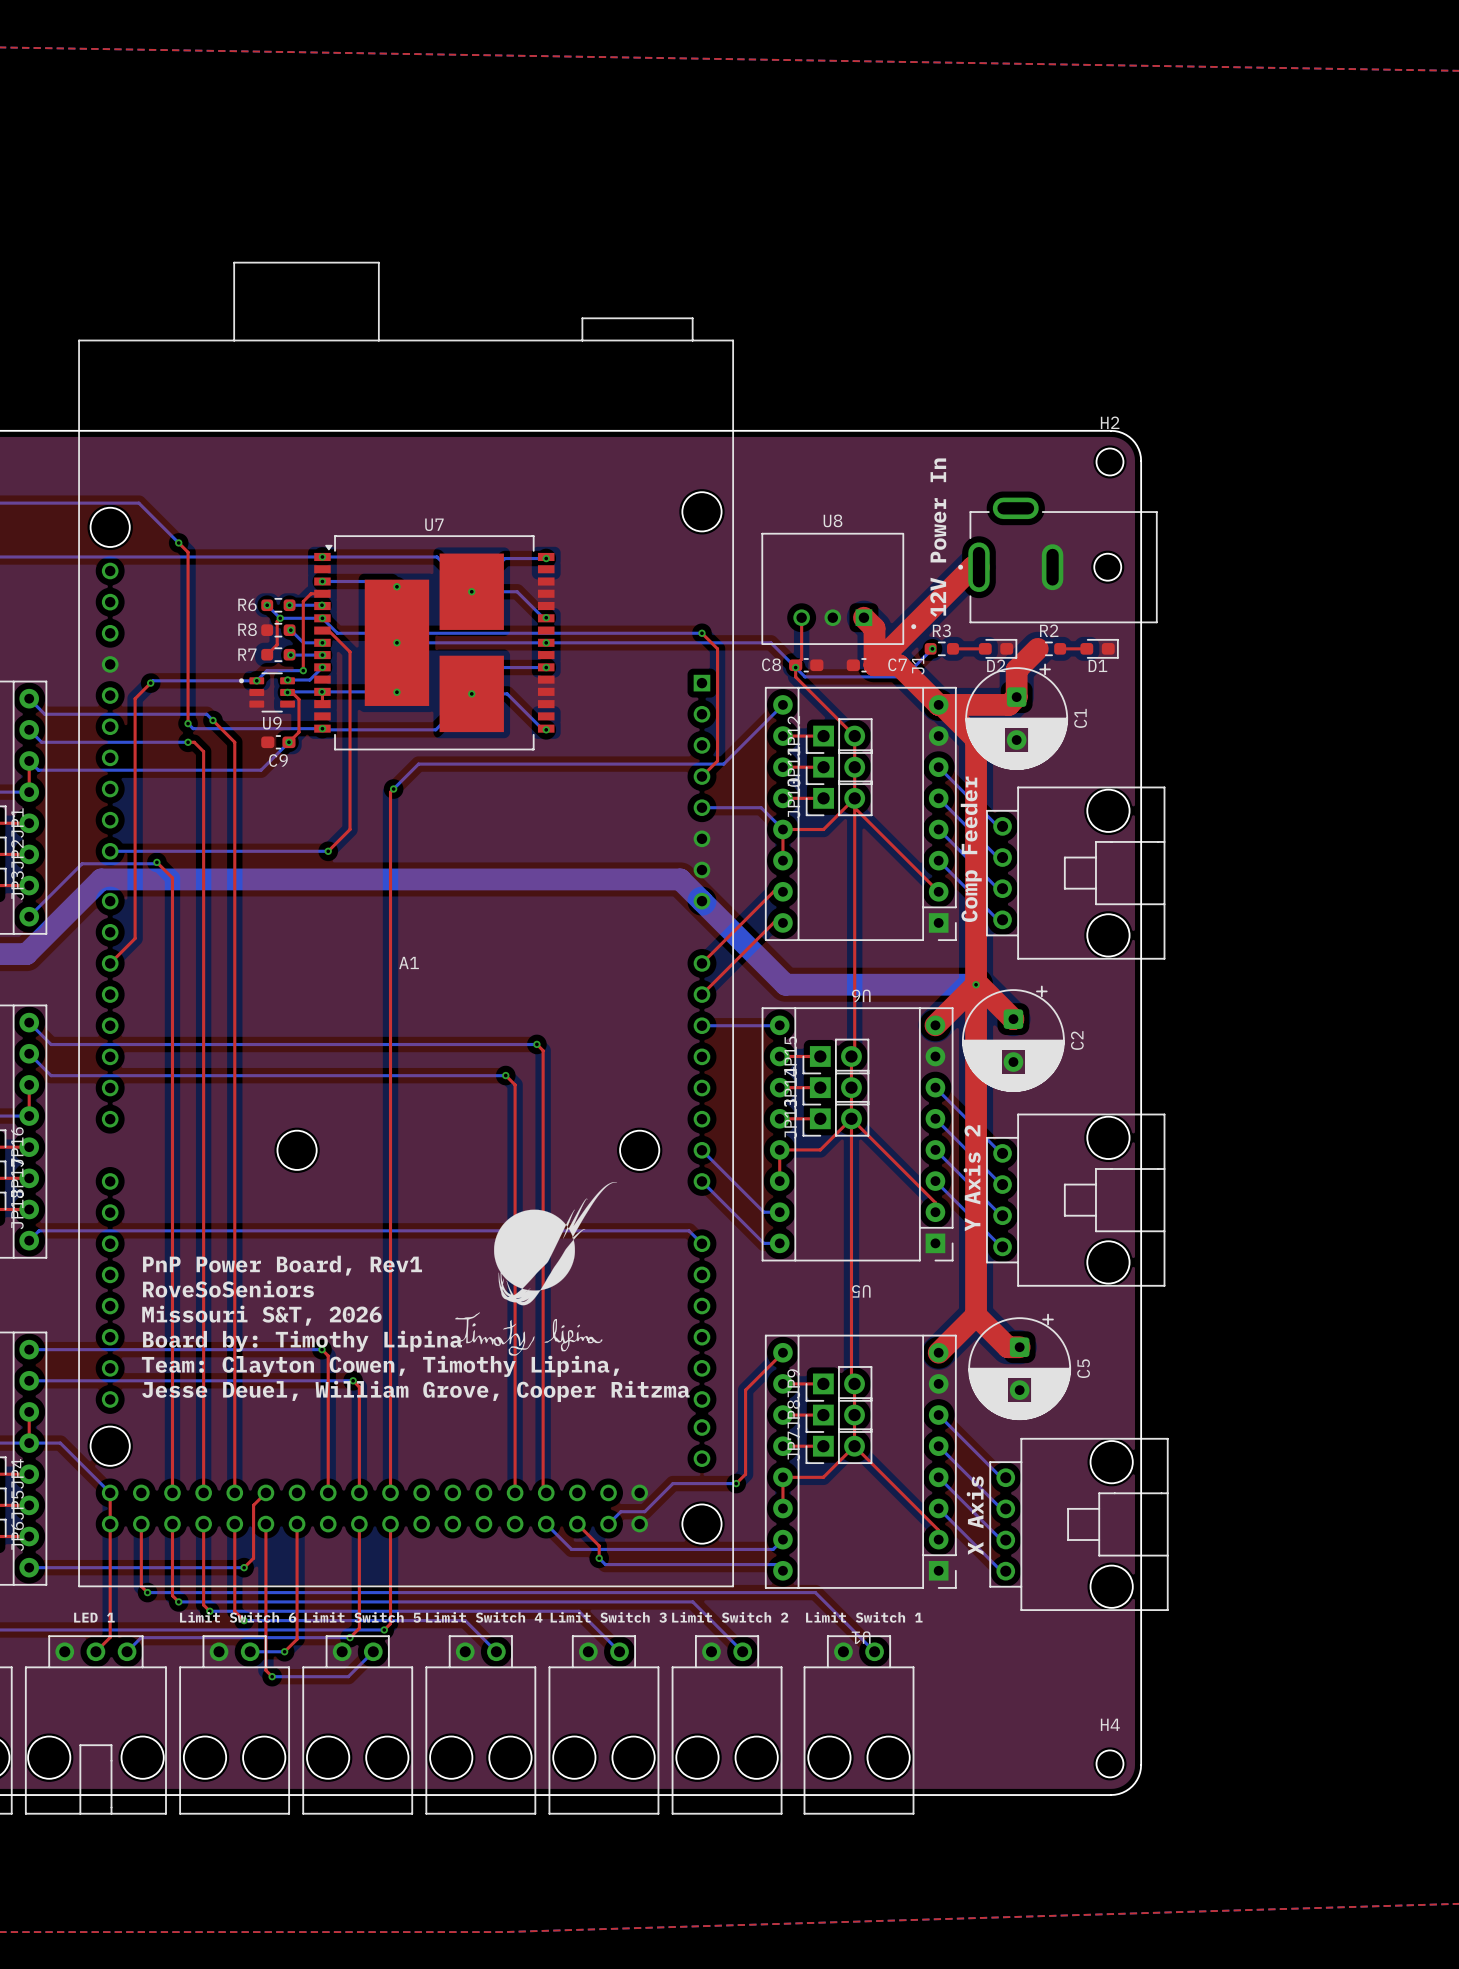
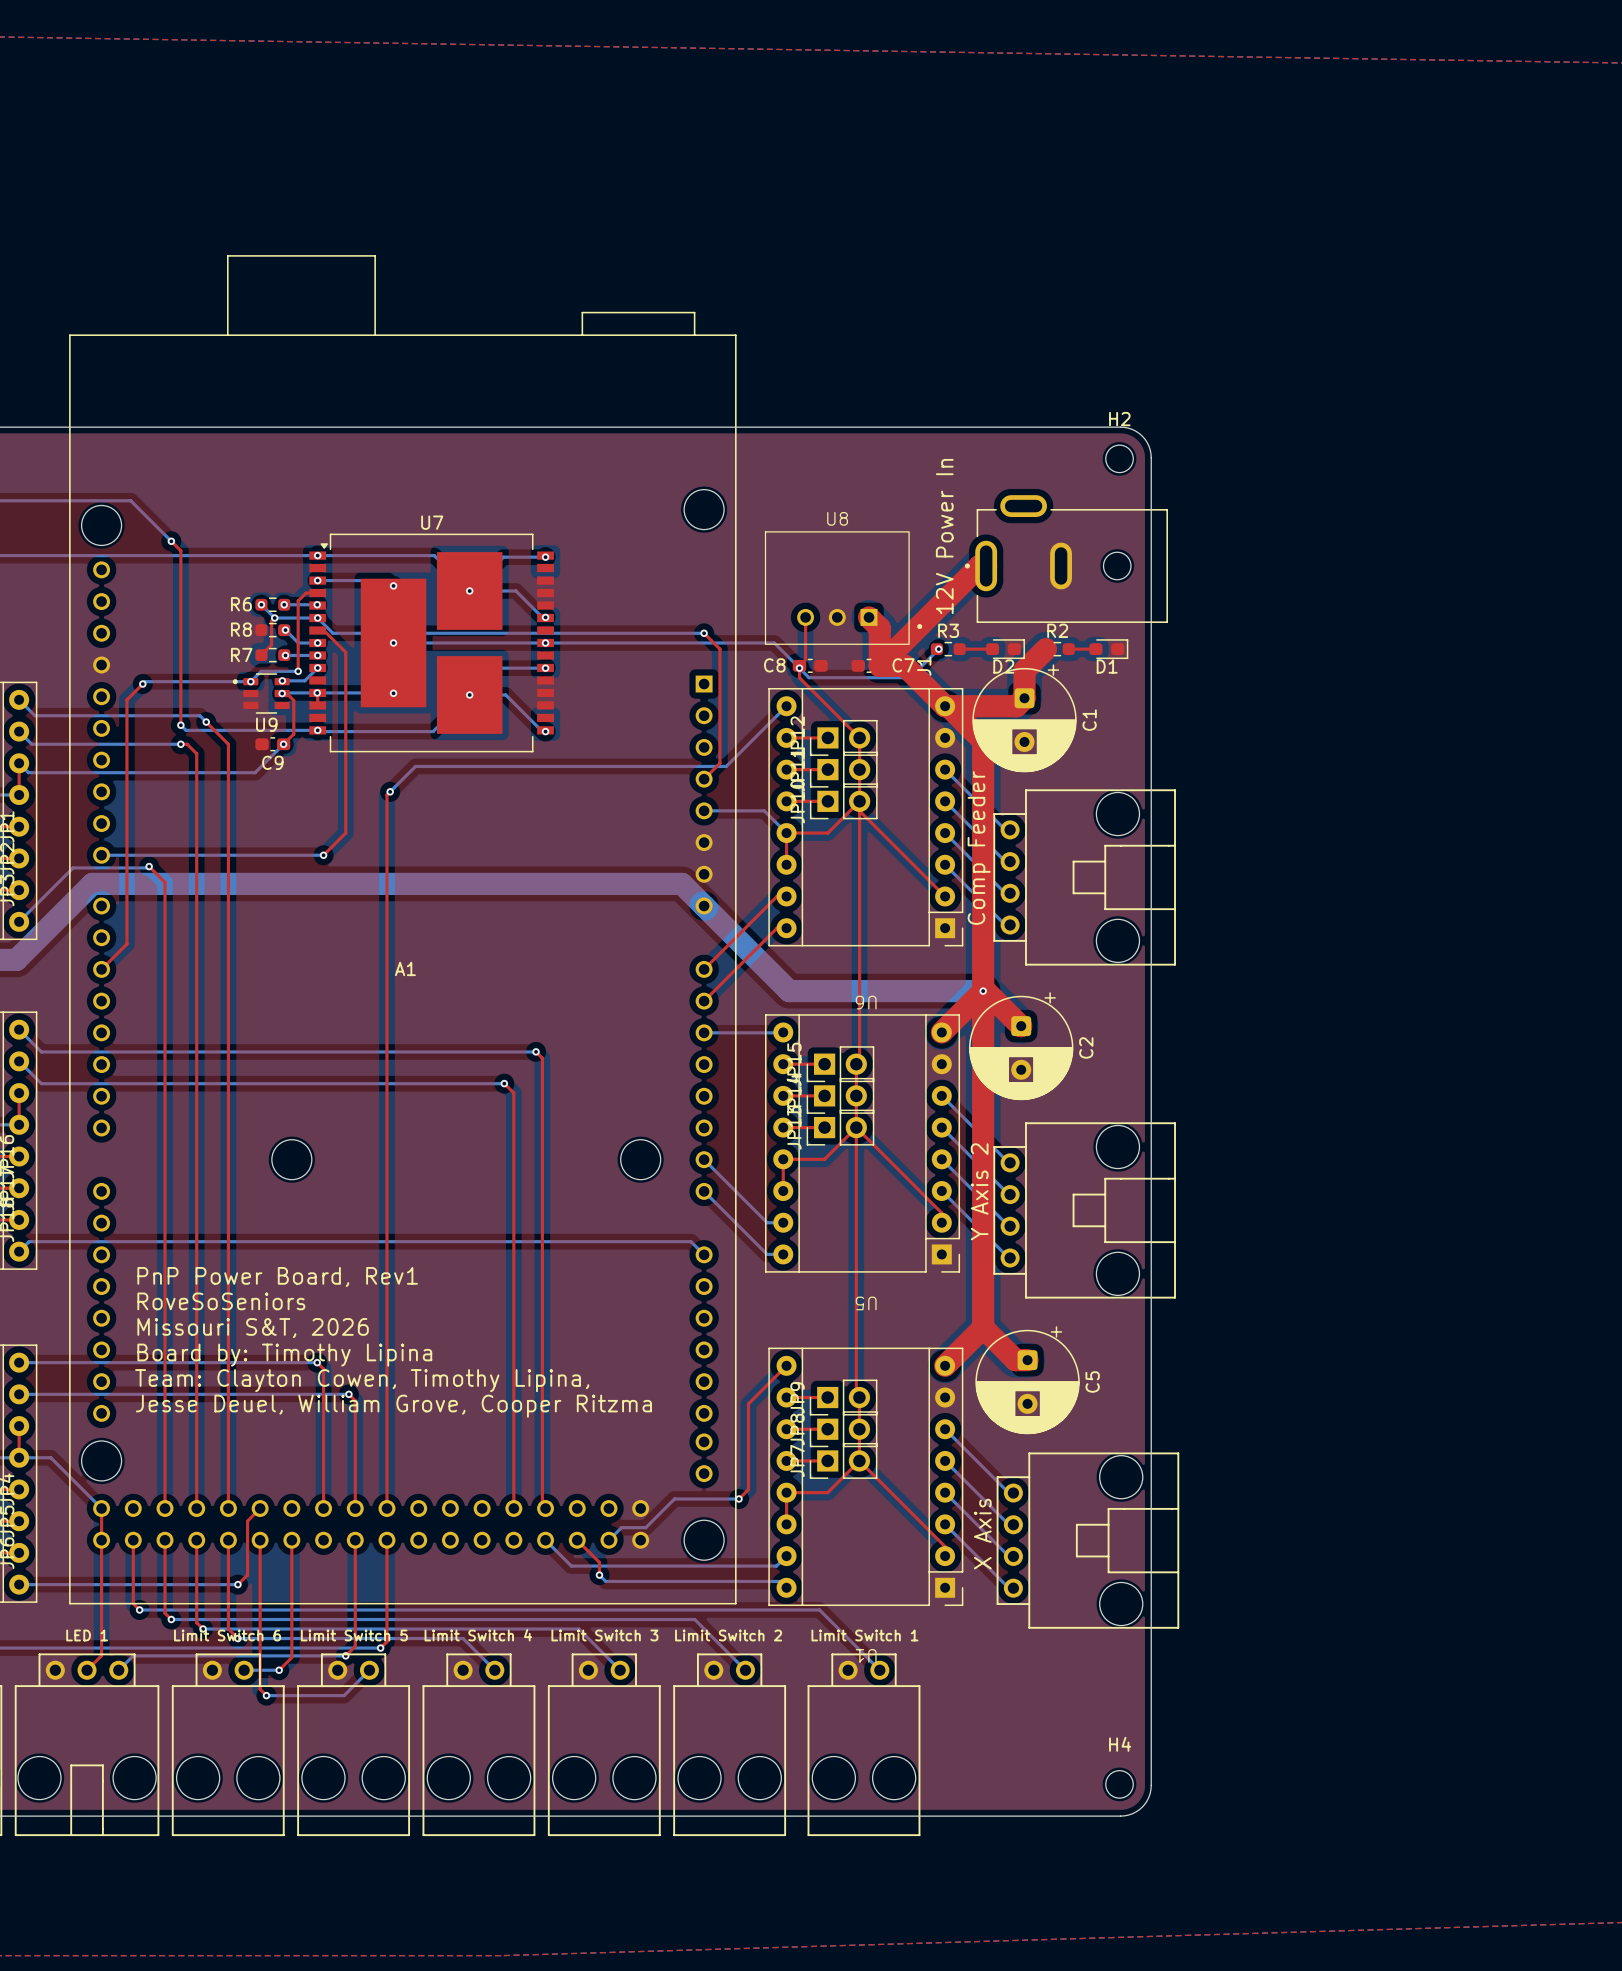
drawing: [452, 1182, 618, 1356] -> none

